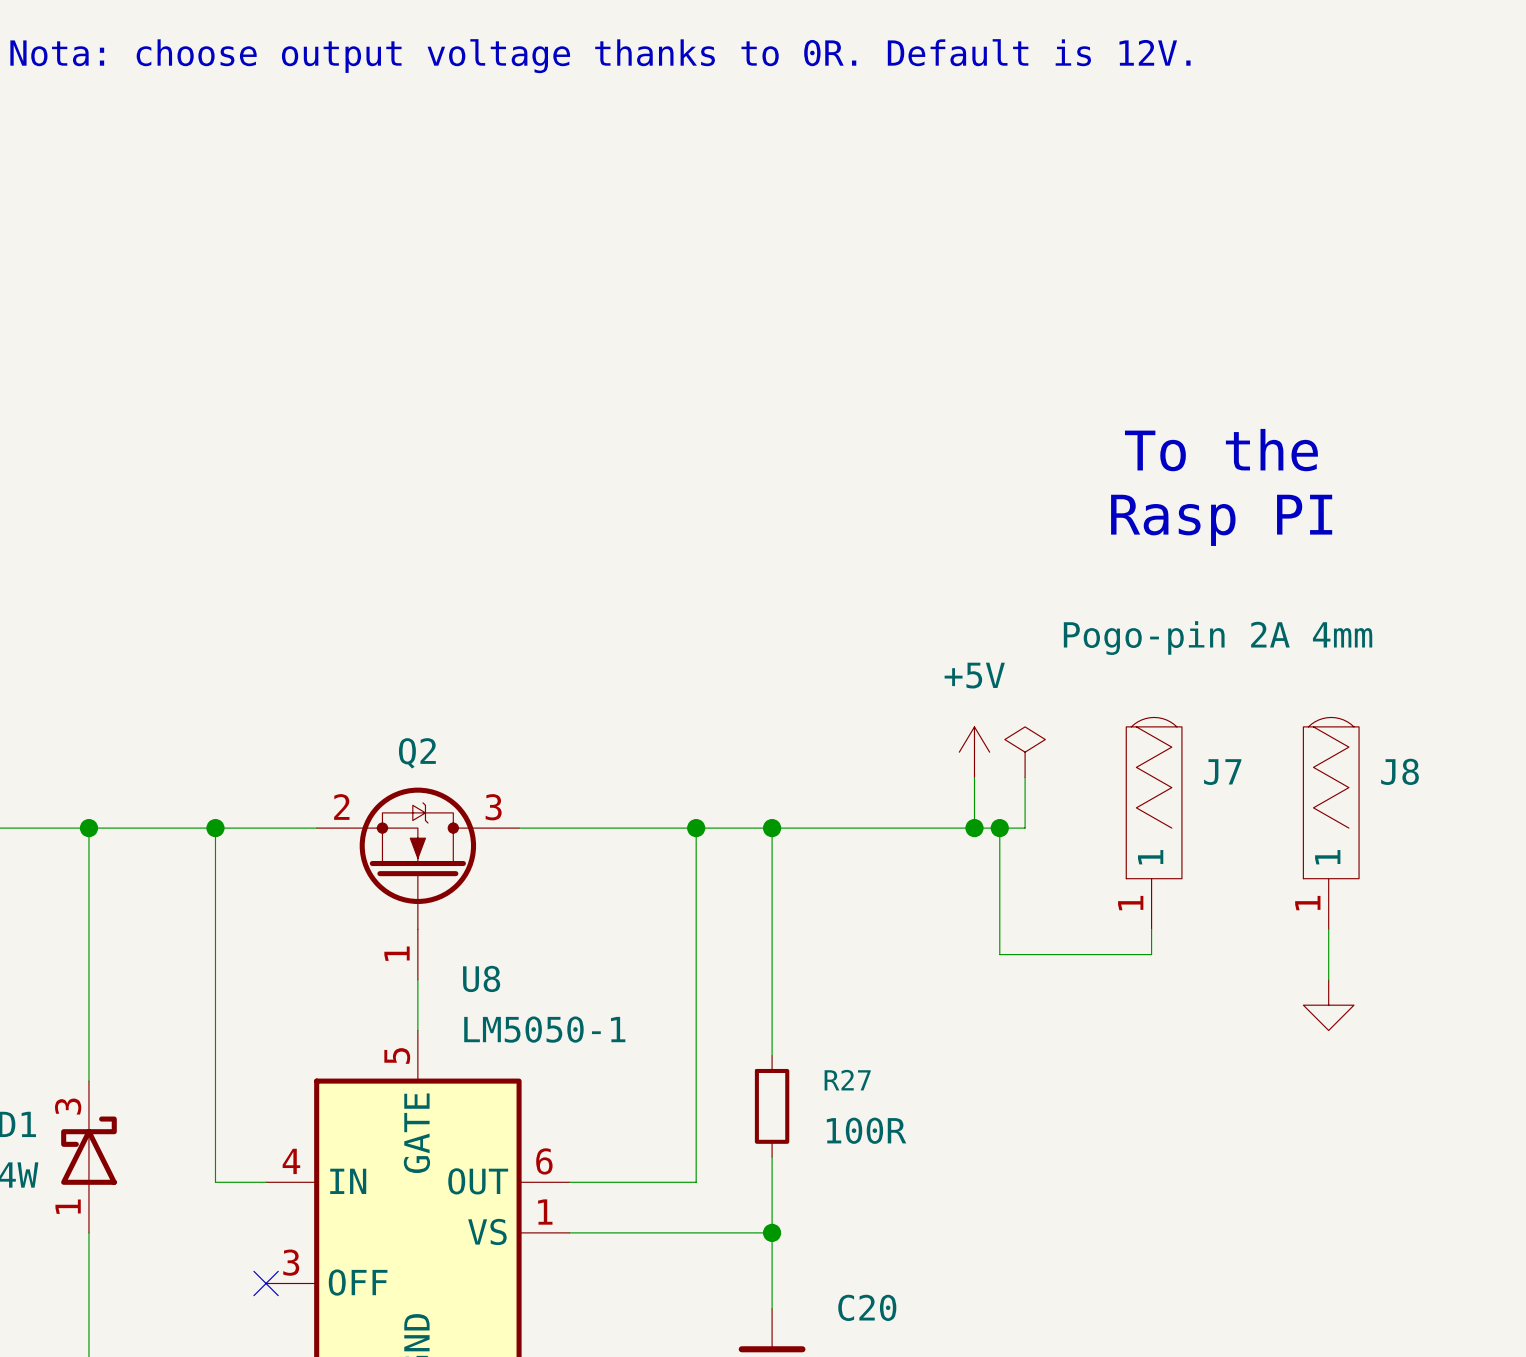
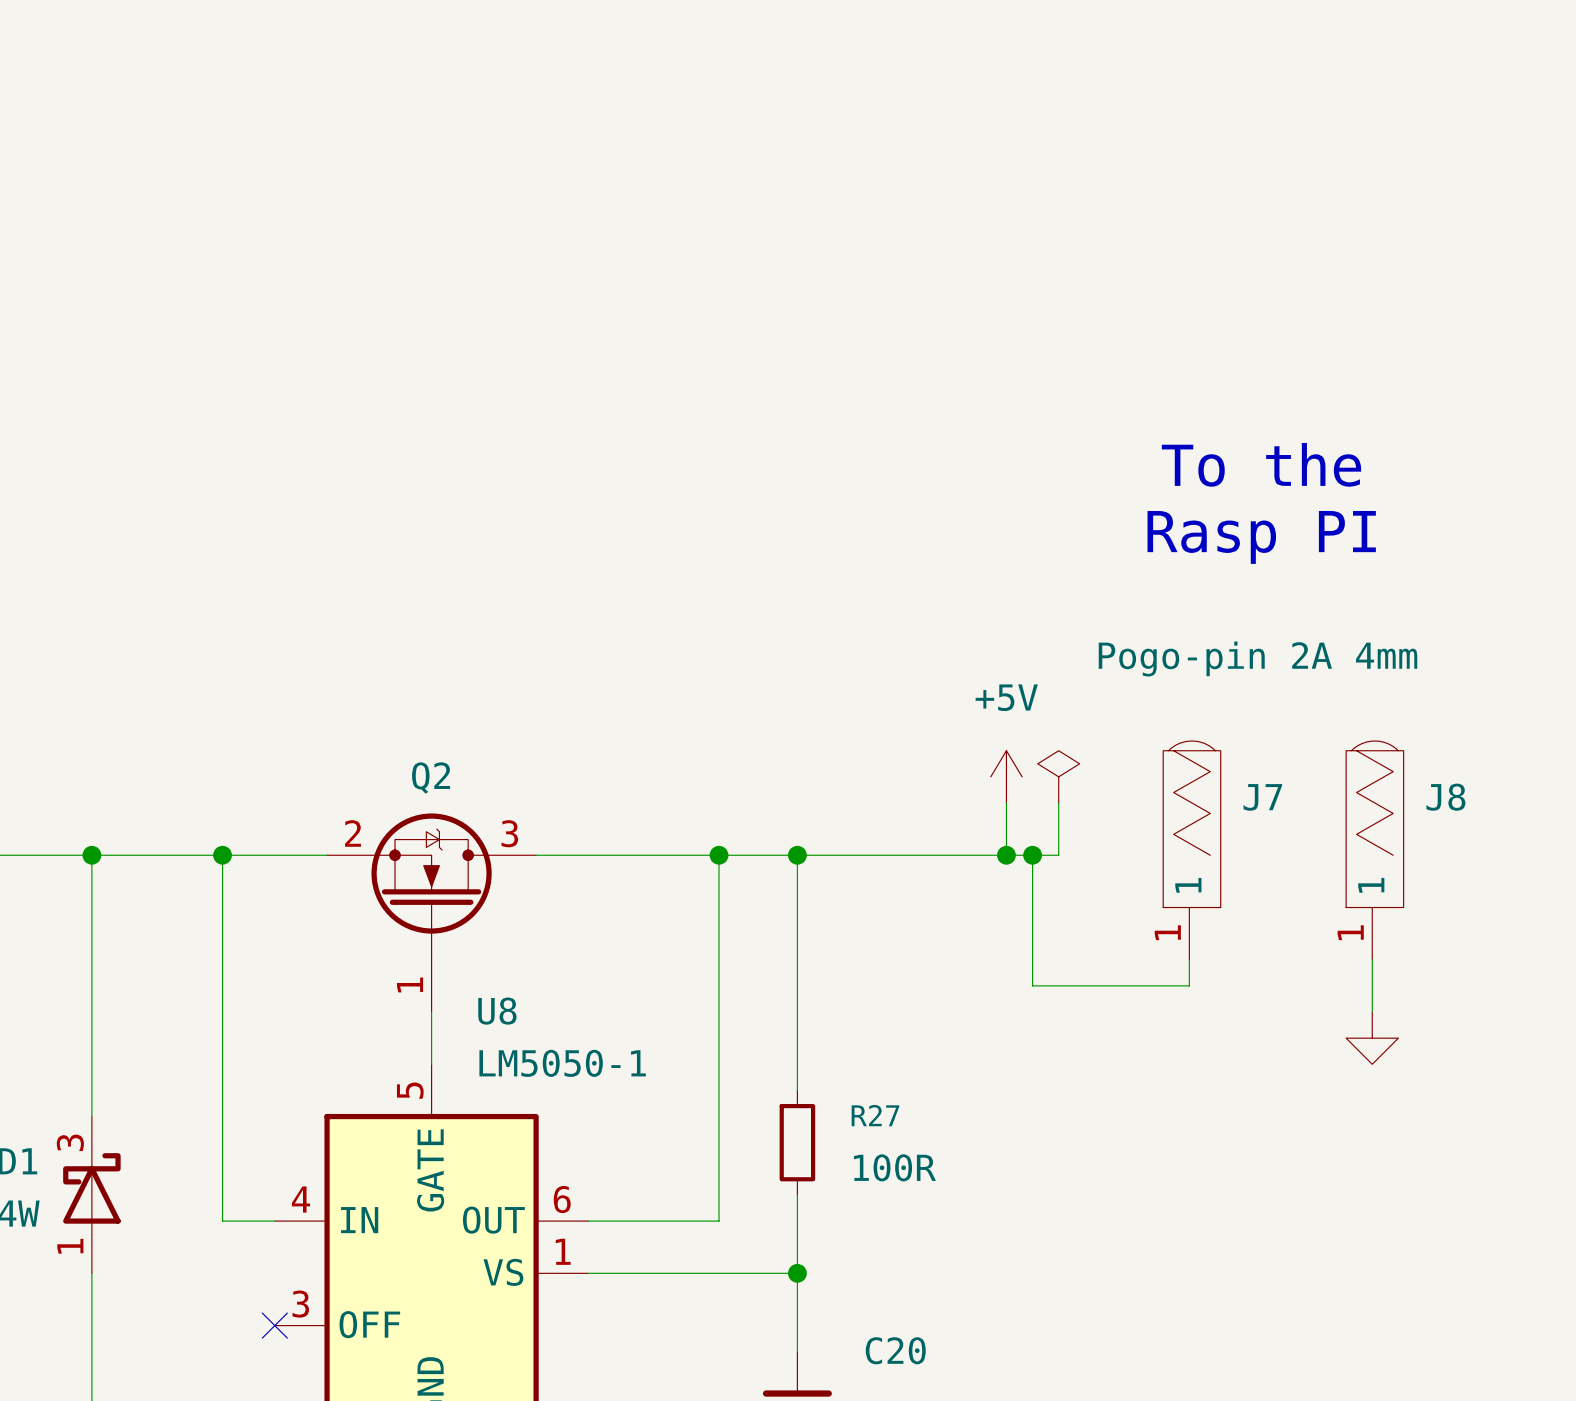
text: Nota: choose output voltage thanks to 0R. Default is 12V. (600, 56) -> none

